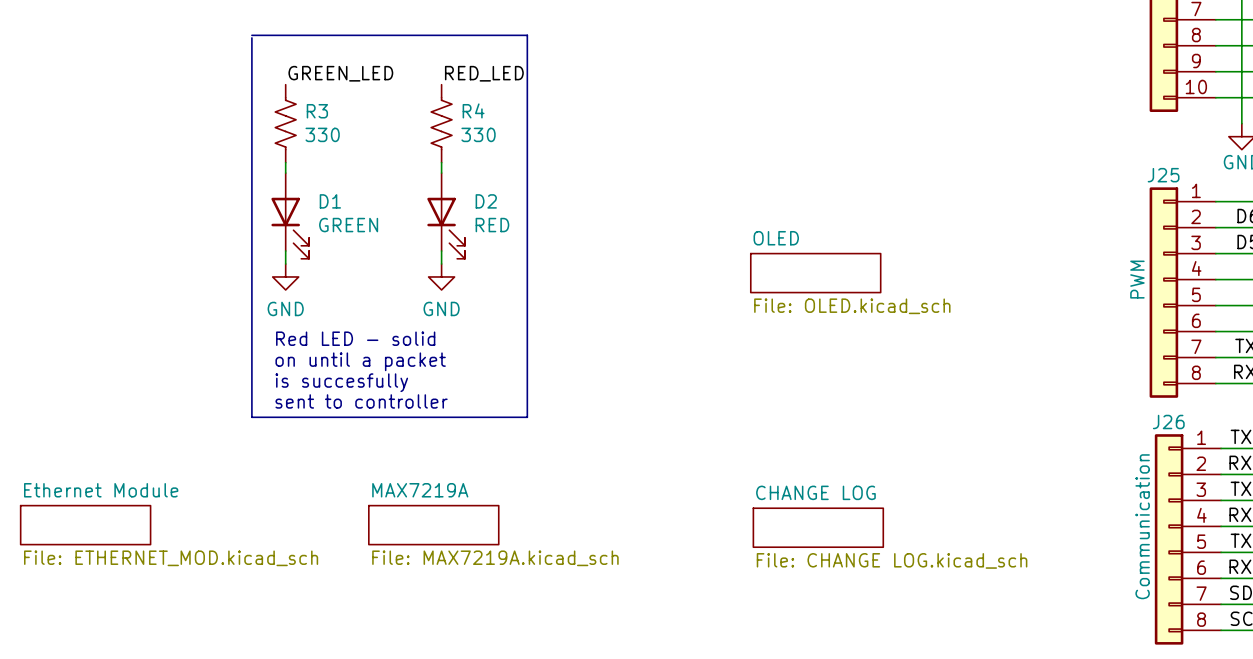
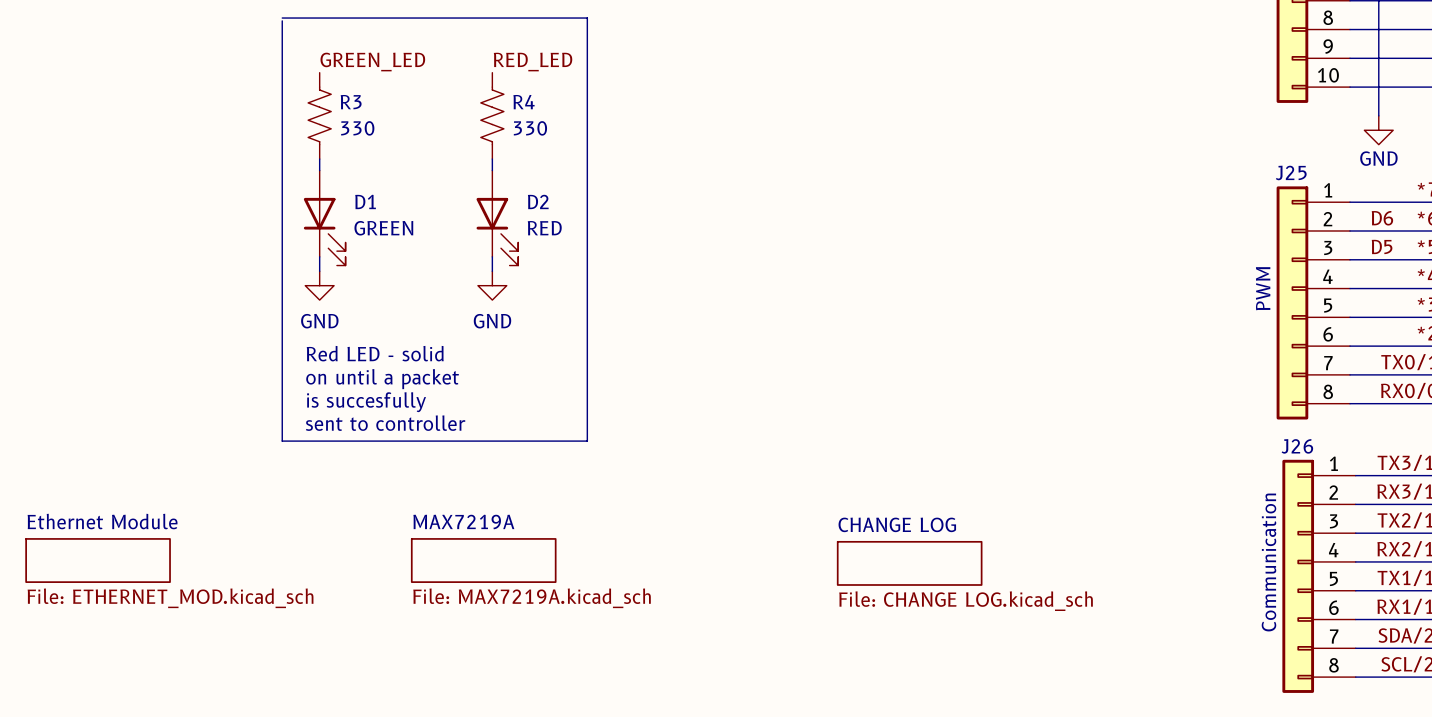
sheet OLED: File: OLED.kicad_sch (815, 273) -> none

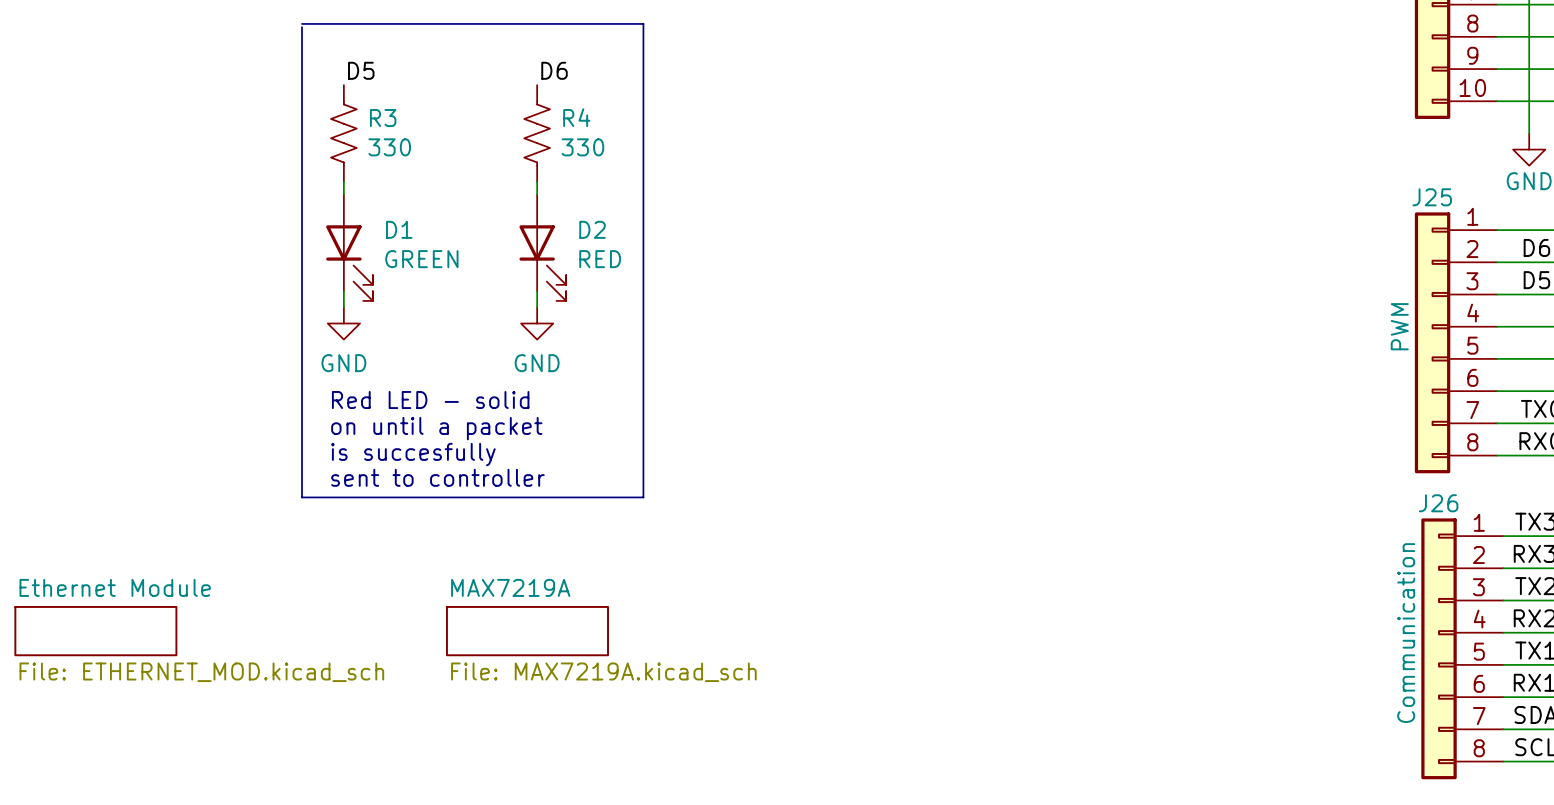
label: GREEN_LED (372, 62) -> D5 (361, 70)
label: RED_LED (533, 62) -> D6 (554, 70)
sheet CHANGE LOG: File: CHANGE LOG.kicad_sch (909, 563) -> none

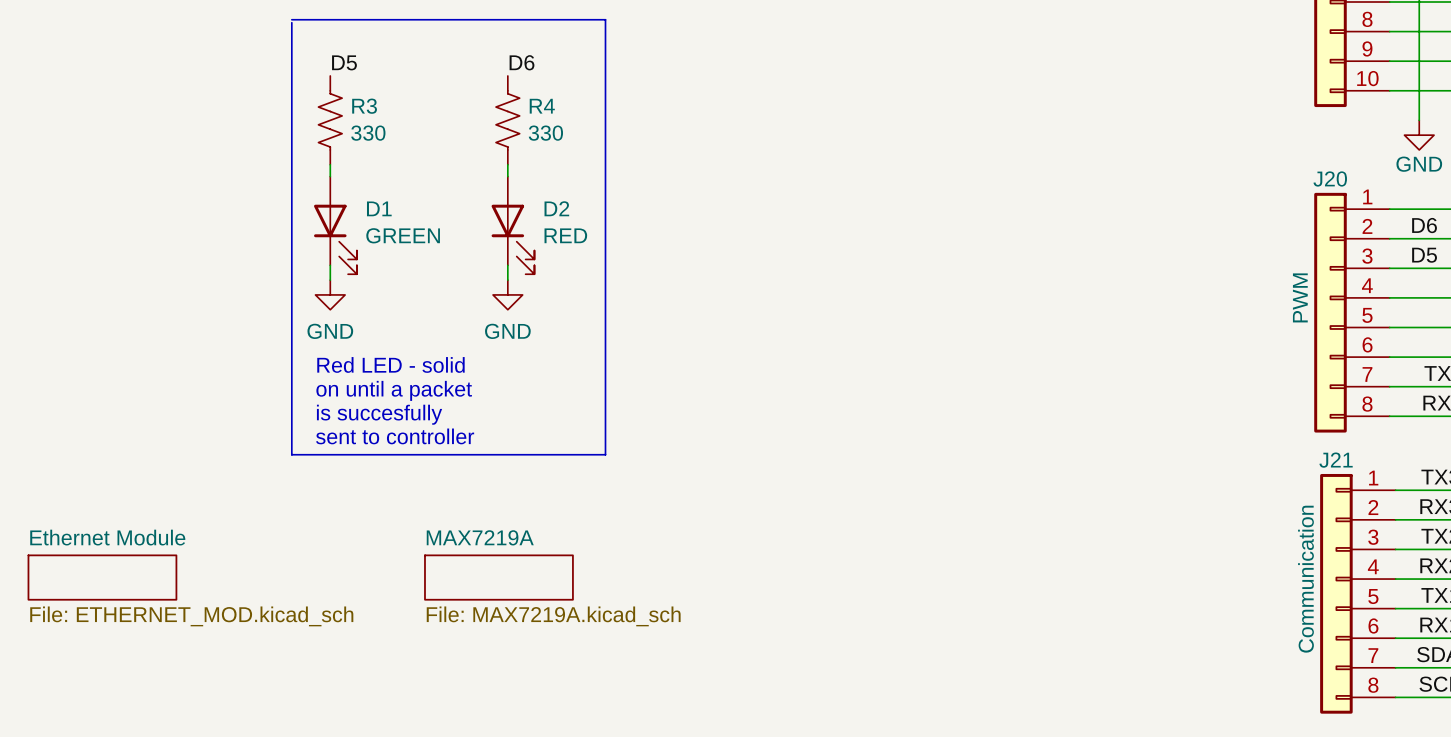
J25 name: J25 (1432, 197) -> J20 (1330, 178)
J26 name: J26 (1438, 503) -> J21 (1336, 460)

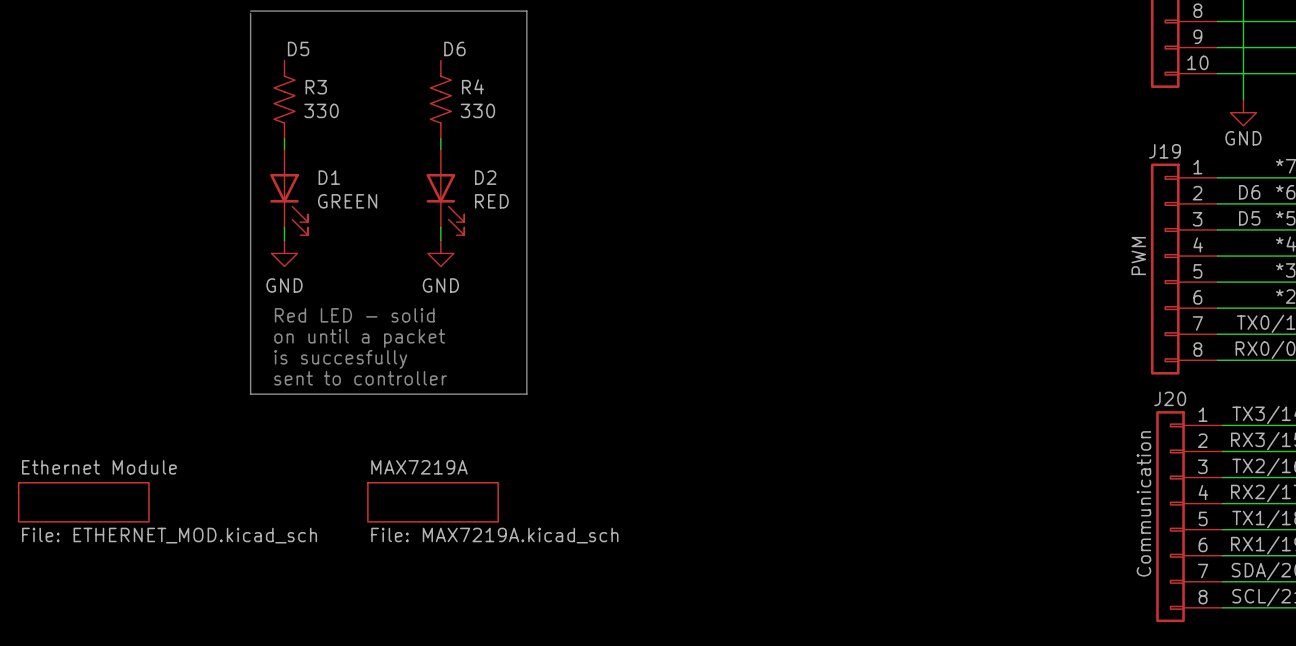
J20 name: J20 (1330, 178) -> J19 (1164, 151)
J21 name: J21 (1336, 460) -> J20 (1170, 398)

